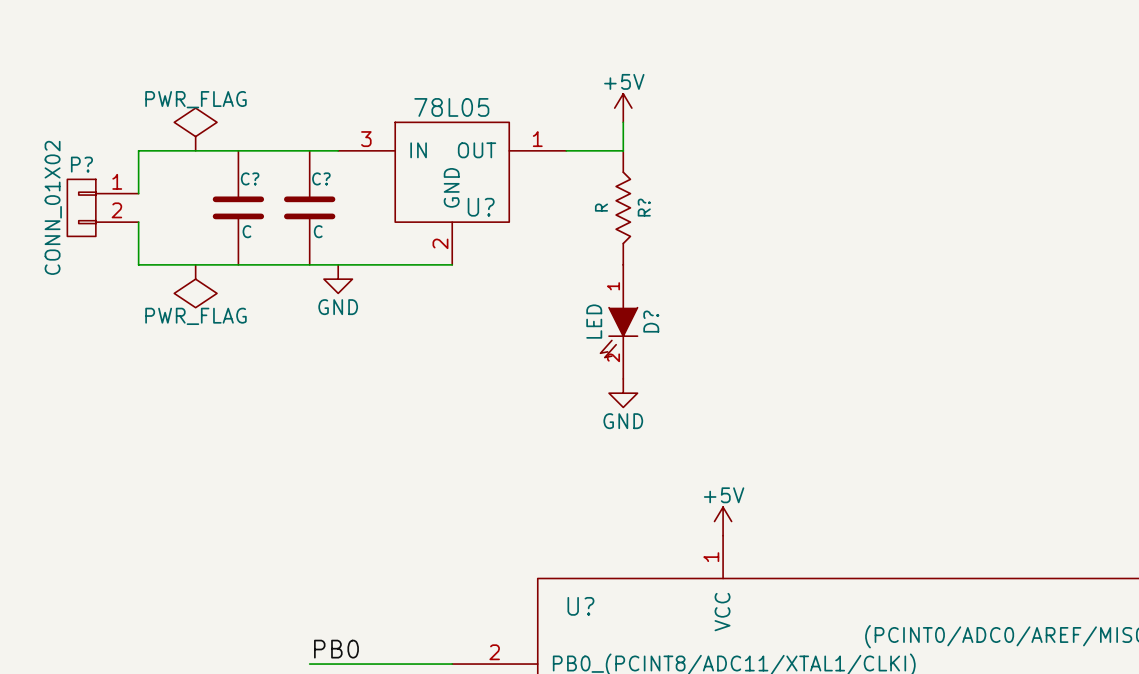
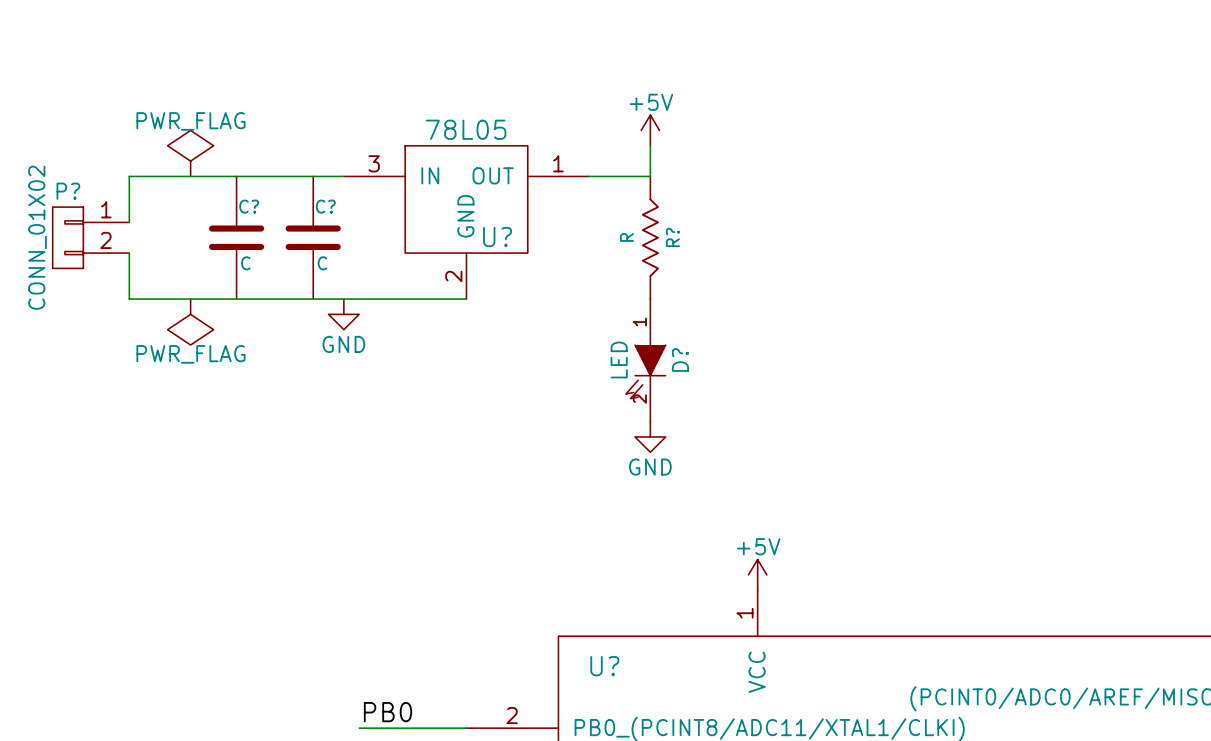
label position: PB0 (336, 649) -> PB0 (387, 712)
wire: (309, 664) (352, 664) -> none

